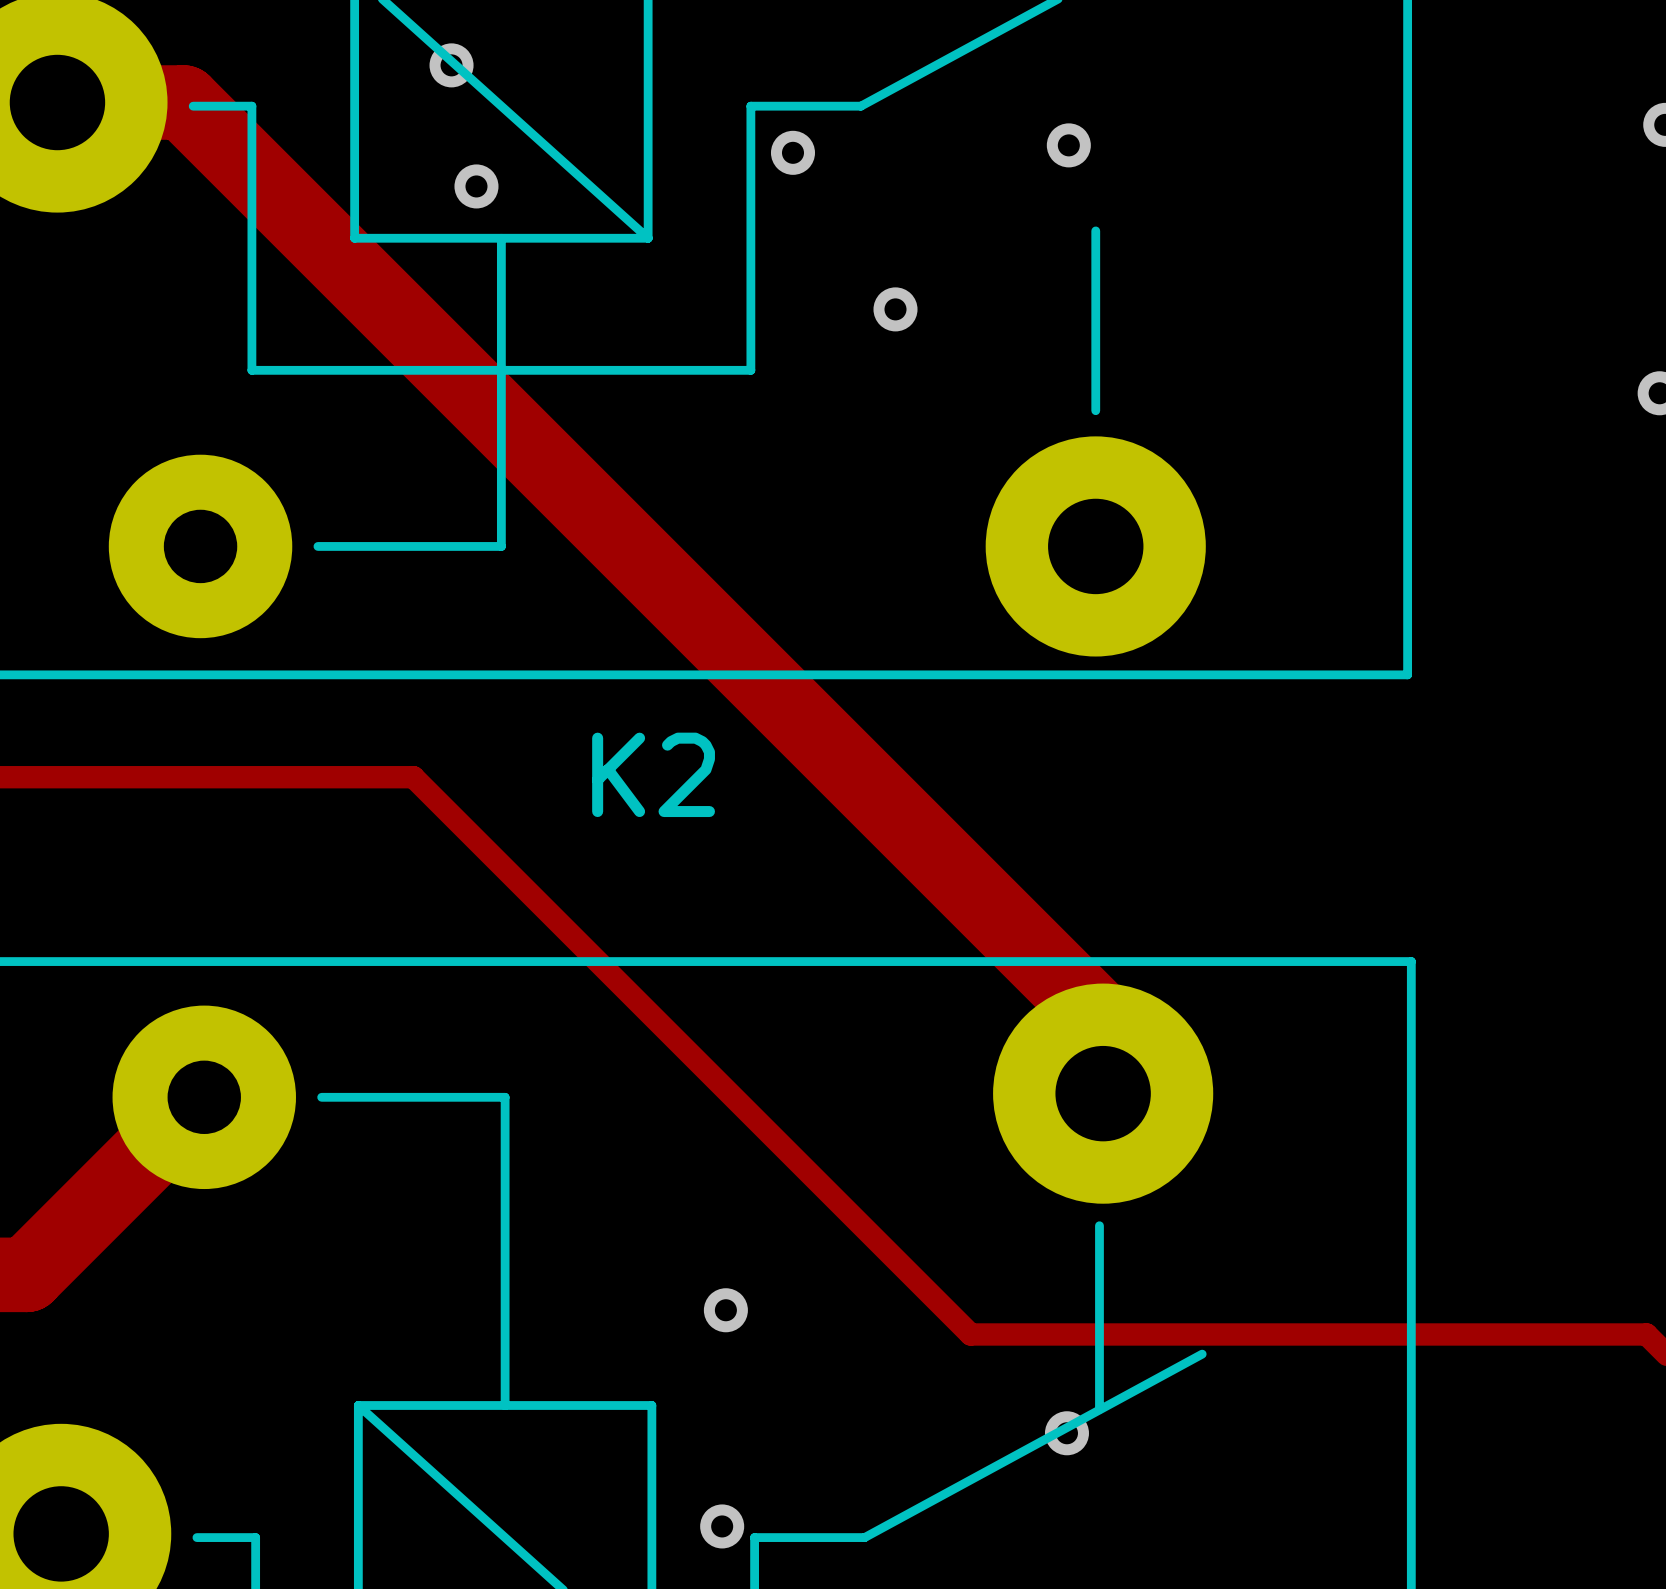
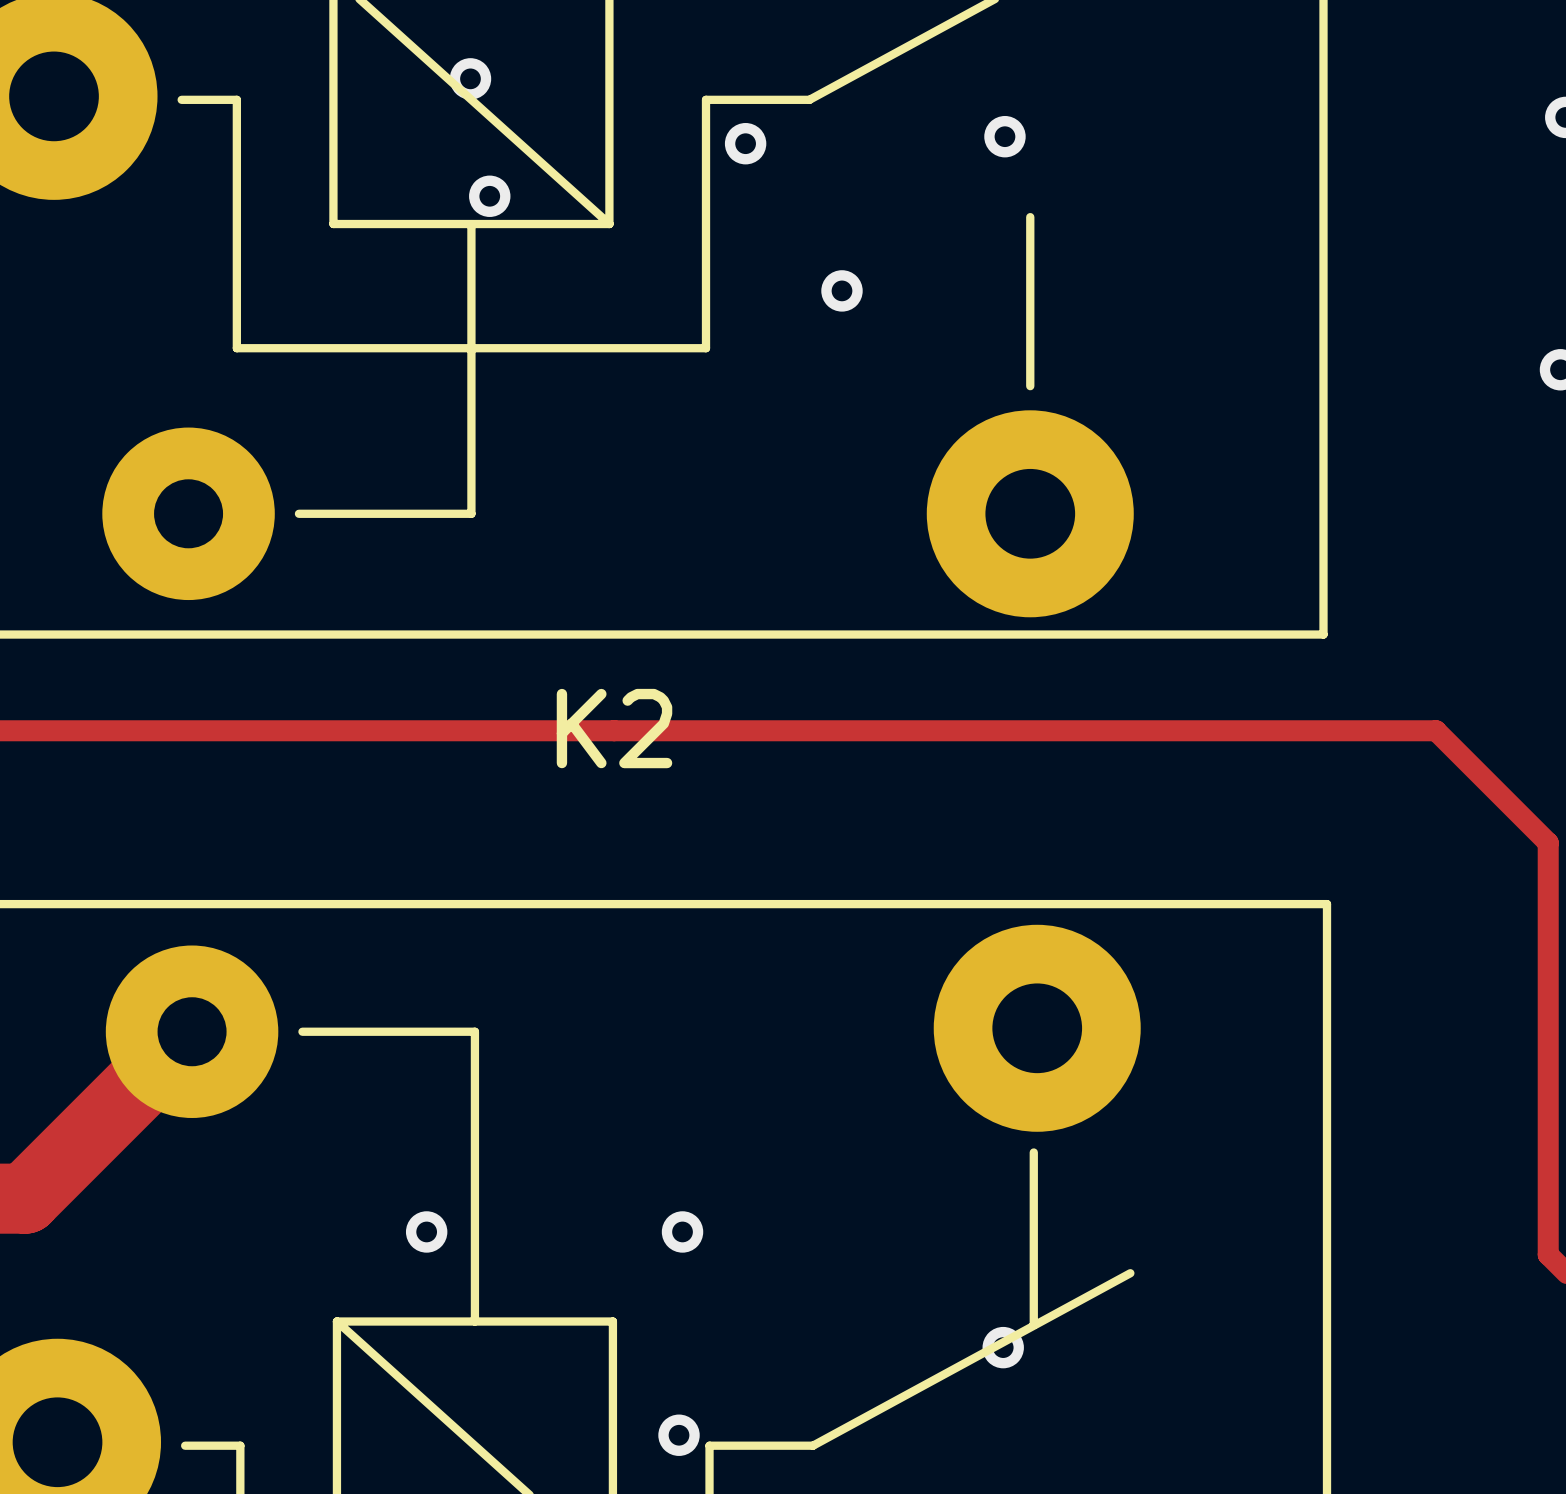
via: (451, 65) -> none
via: none -> (470, 78)
track: (57, 102) (183, 102) (1103, 1022) (1103, 1093) -> none
via position: (476, 186) -> (489, 196)
track: (413, 777) (970, 1334) (1646, 1334) -> (388, 730) (1436, 730) (1548, 842) (1548, 1254)
via: none -> (426, 1231)

